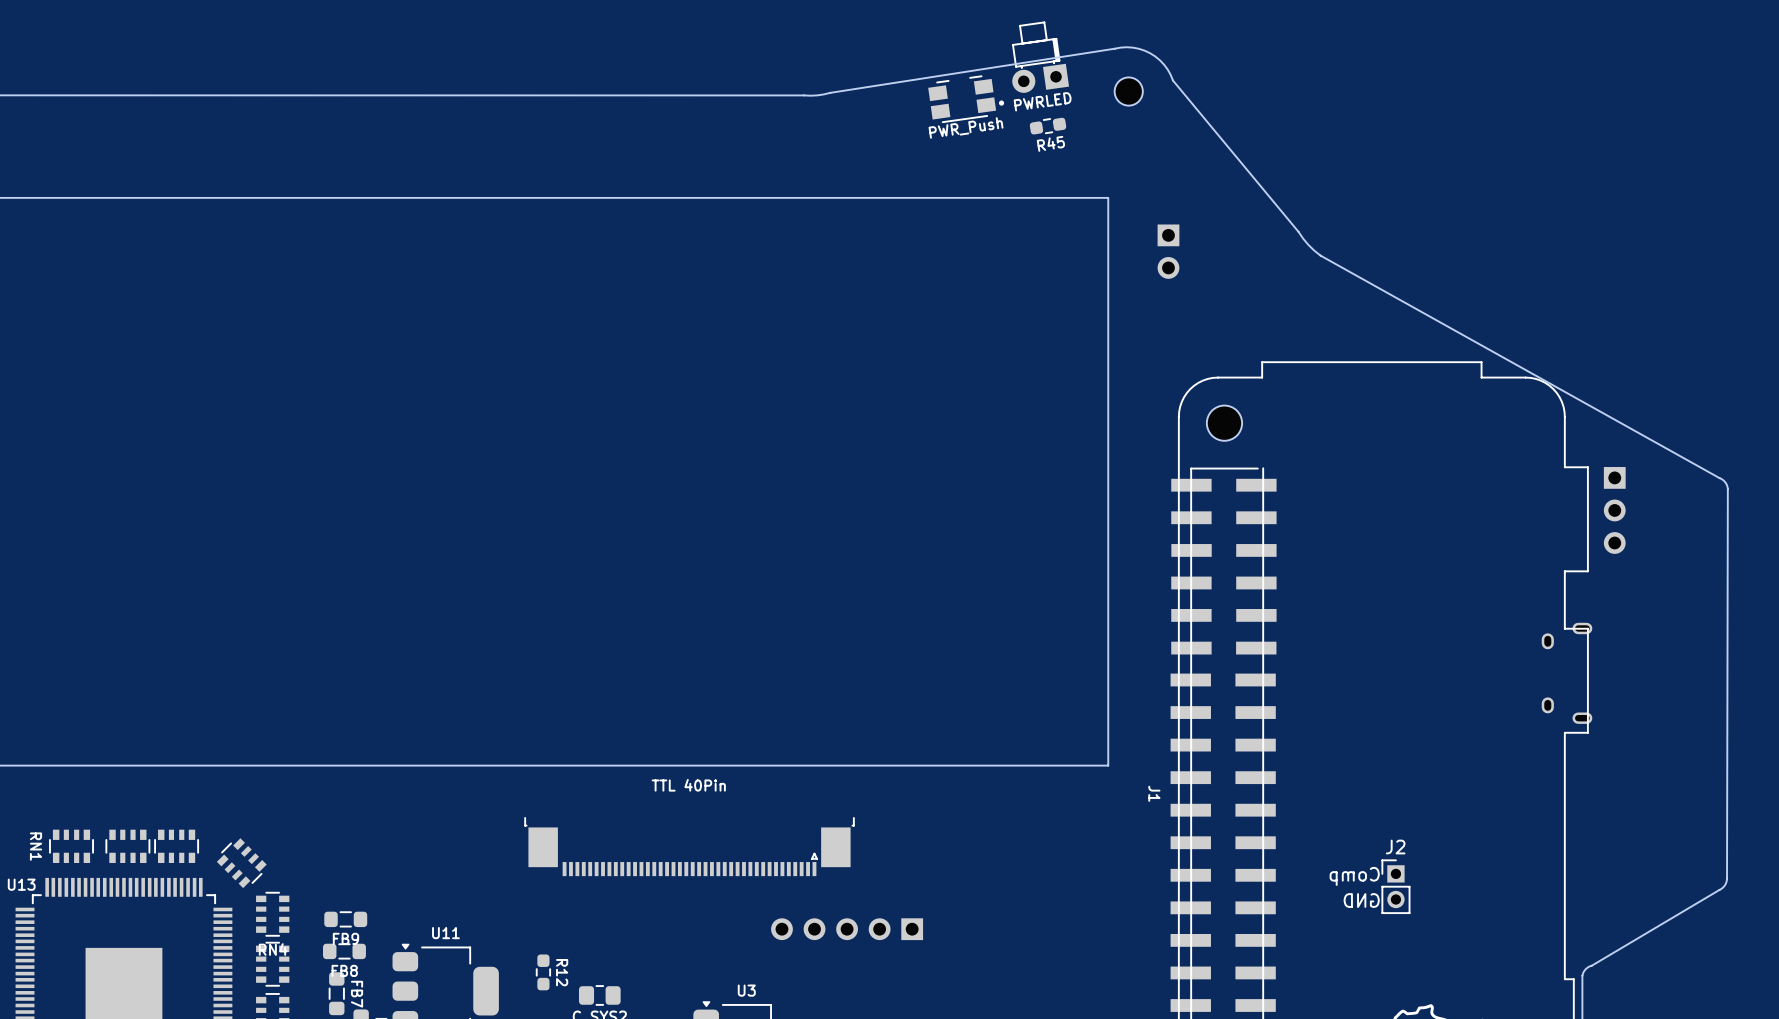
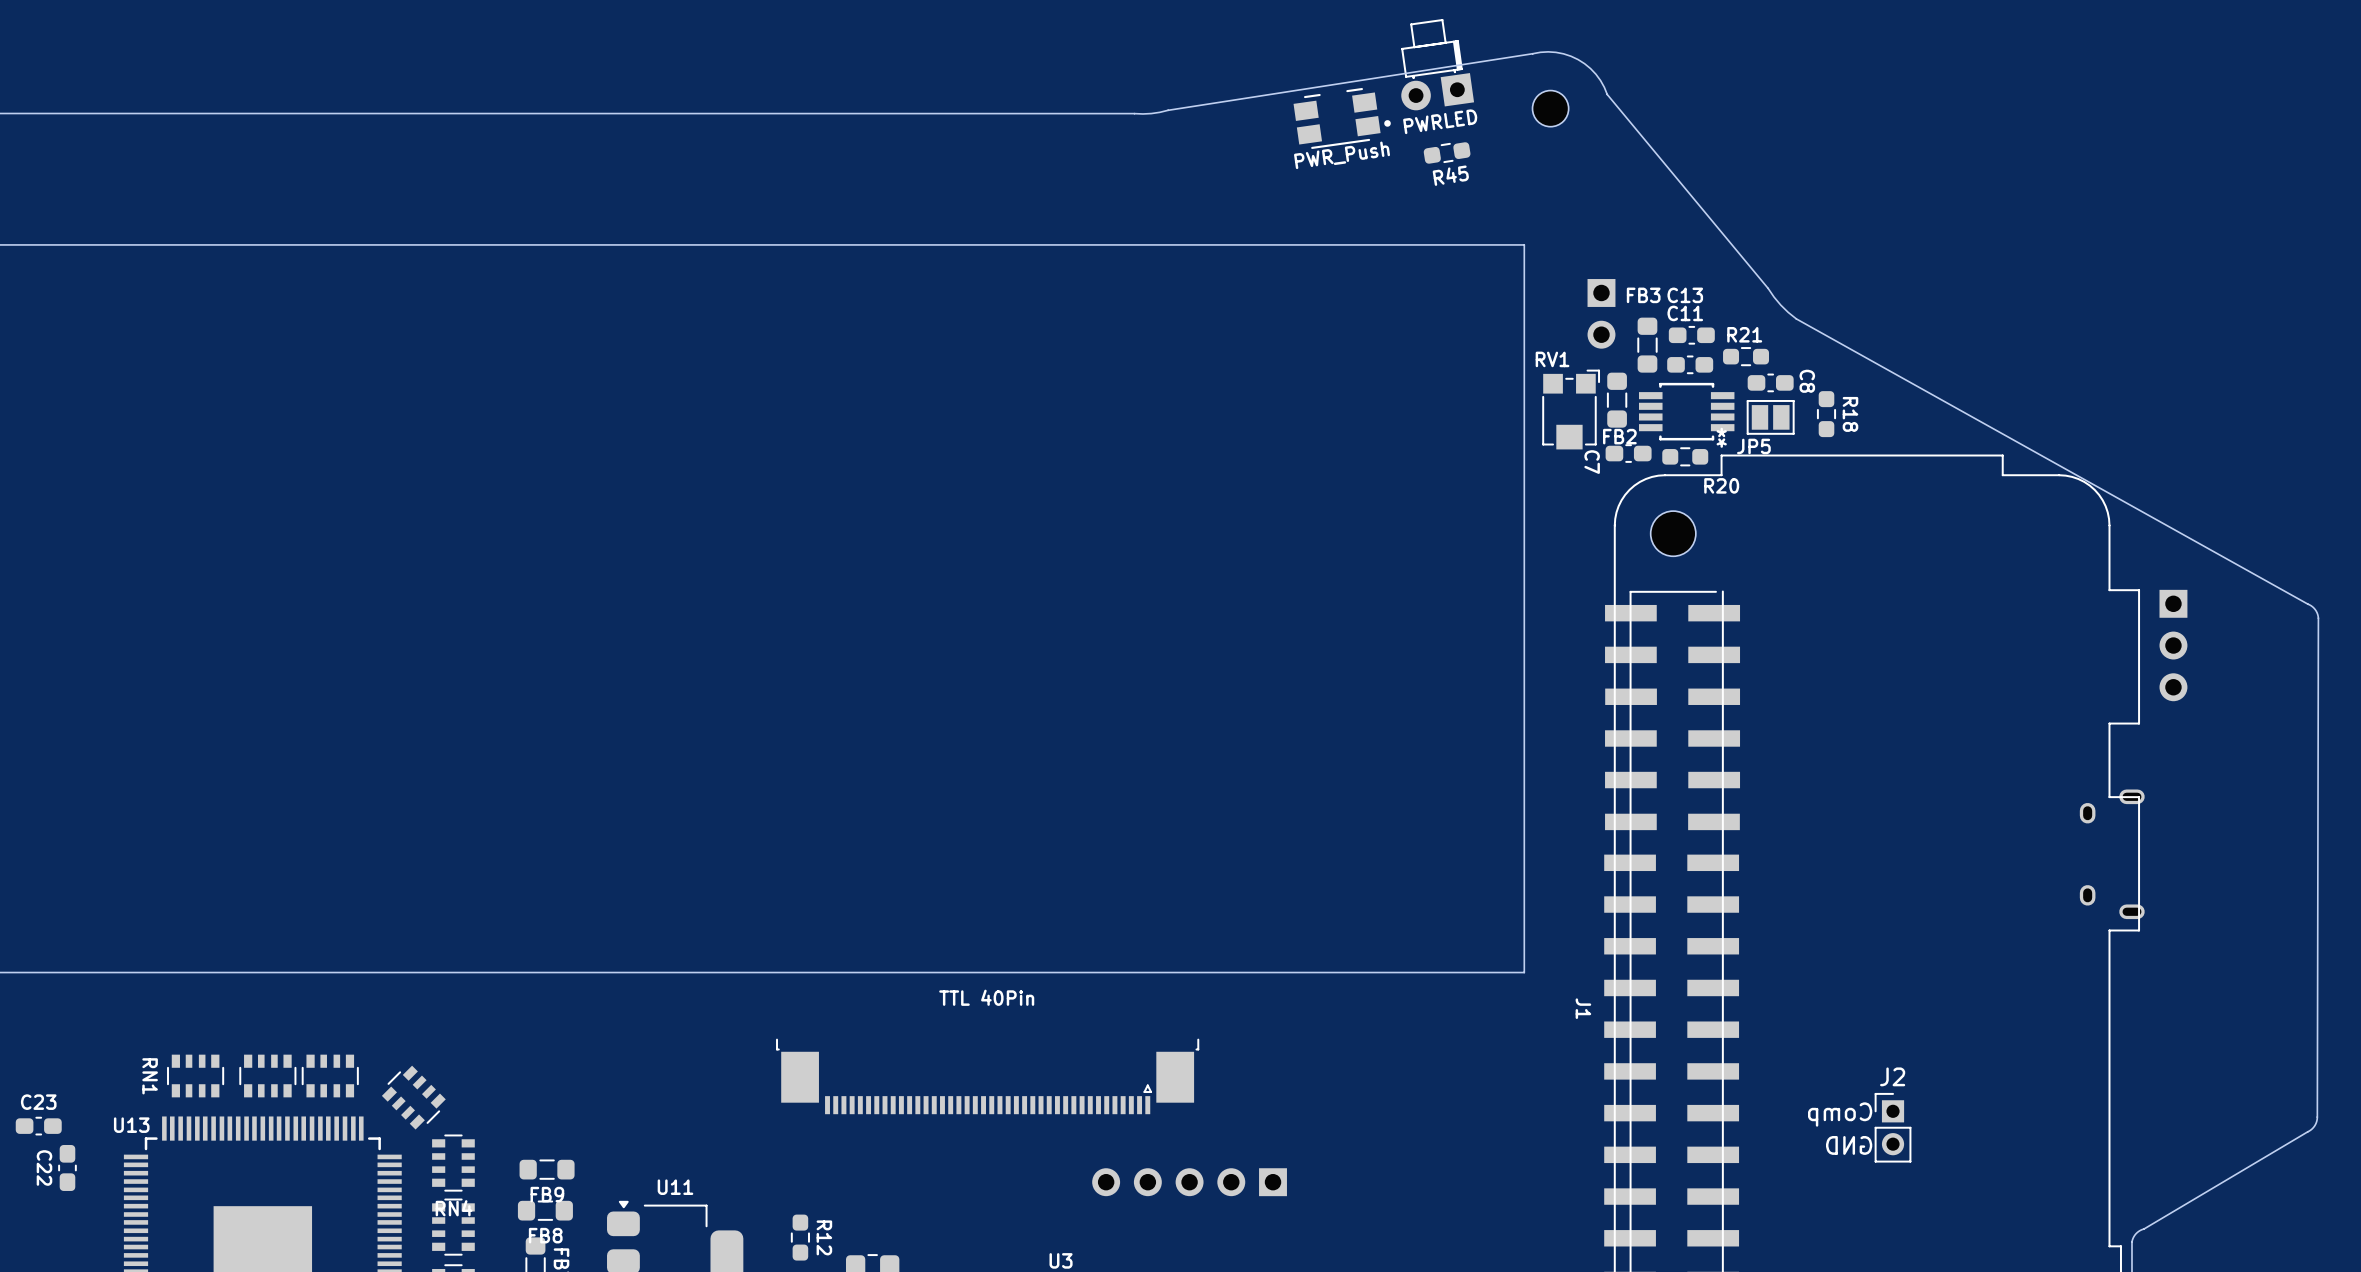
C13: none -> (1691, 335)
FB3: none -> (1647, 345)
R21: none -> (1746, 356)
C11: none -> (1690, 364)
C8: none -> (1770, 382)
FB2: none -> (1617, 400)
RV1: none -> (1571, 409)
part: none -> (1686, 411)
R18: none -> (1826, 414)
JP5: none -> (1770, 417)
C7: none -> (1628, 453)
R20: none -> (1685, 456)

